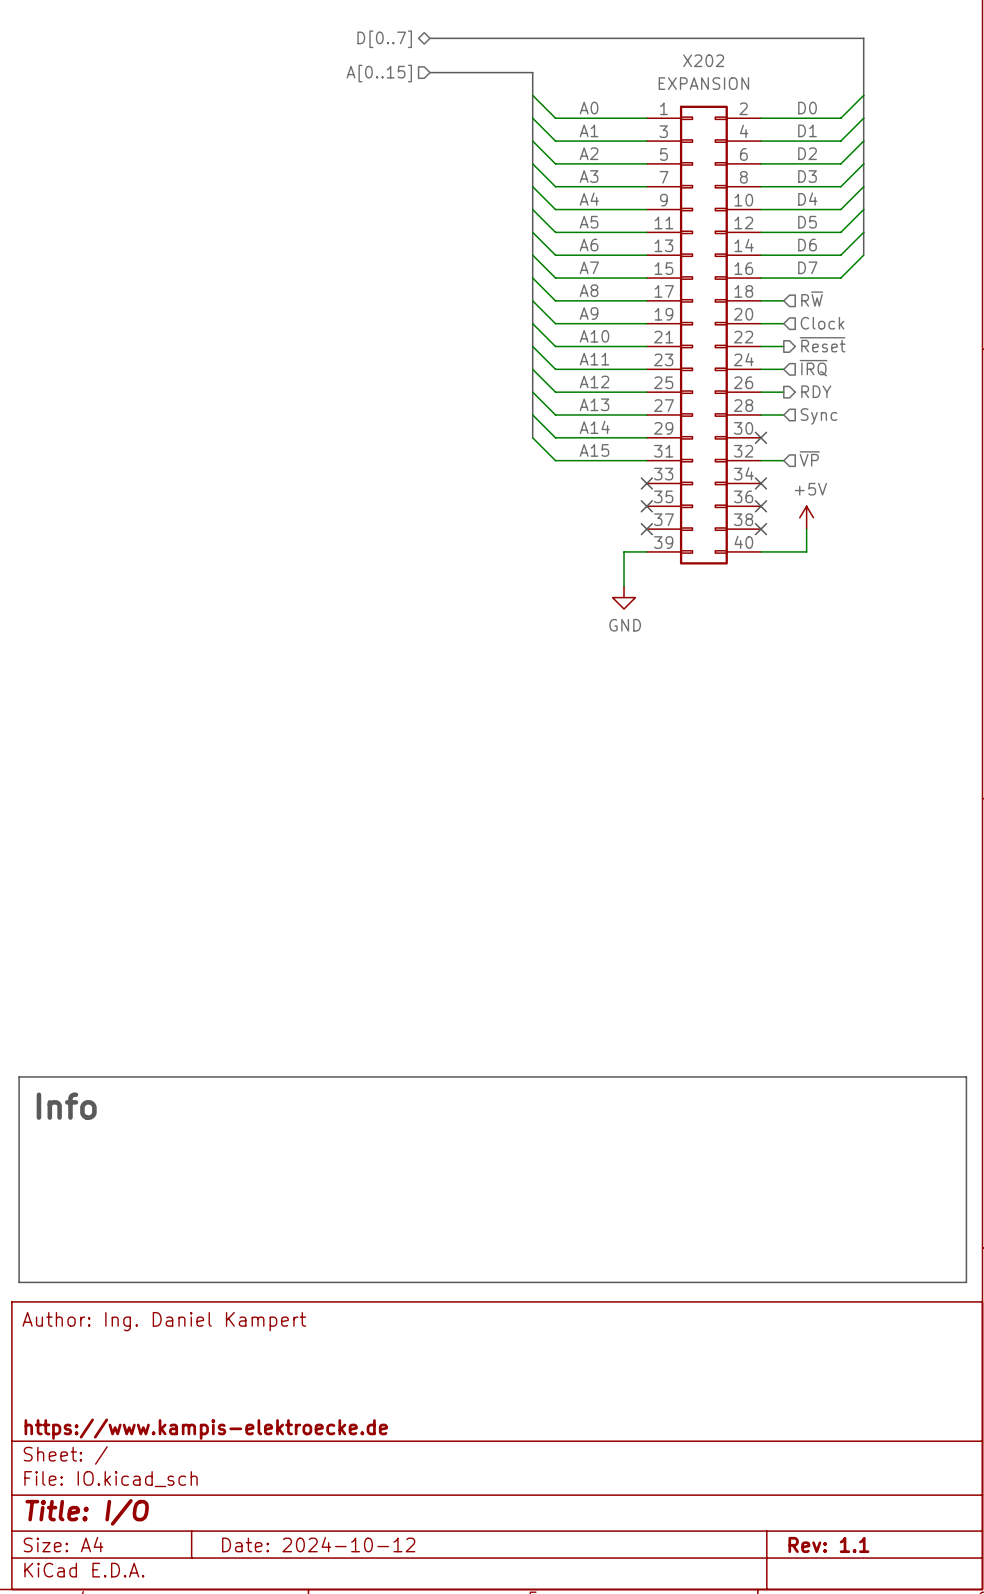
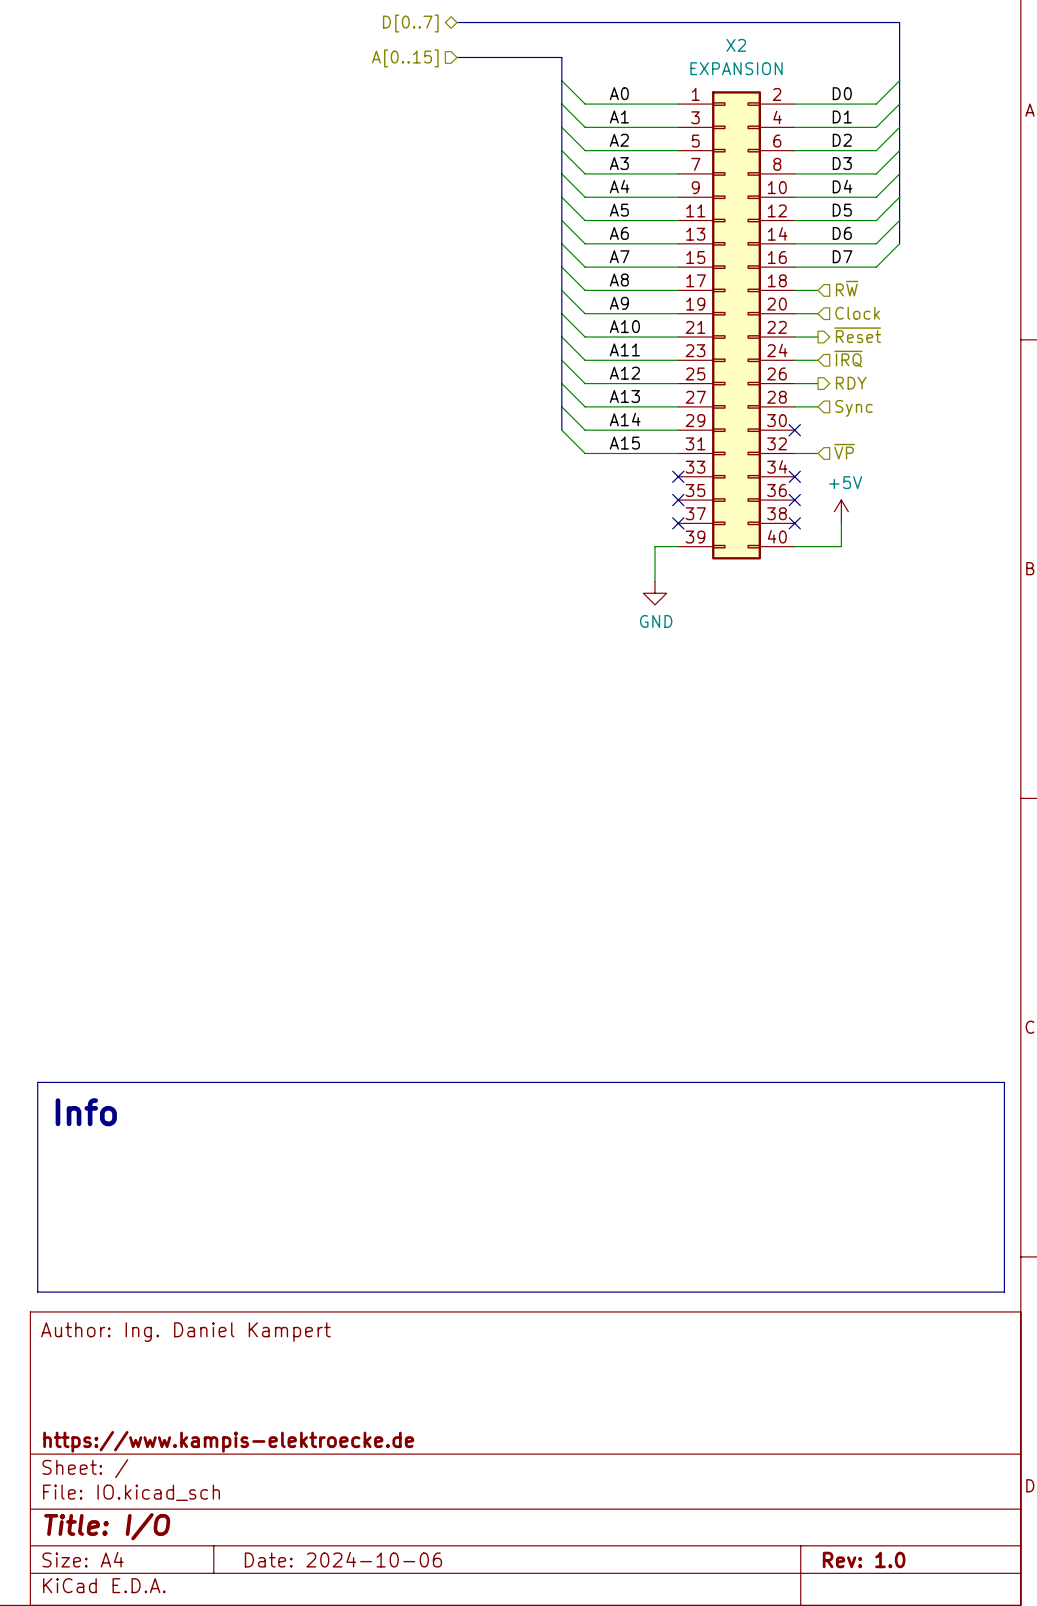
X202 name: X202 (703, 60) -> X2 (736, 45)
title block: Date: 2024-10-12 (318, 1544) -> Date: 2024-10-06 (343, 1559)
title block: Rev: 1.1 (828, 1544) -> Rev: 1.0 (864, 1559)

